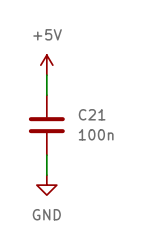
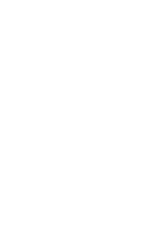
power symbol: +5V (46, 65) -> none
wire: (46, 75) (46, 95) -> none
C21: 100n (46, 125) -> none
wire: (46, 155) (46, 175) -> none
power symbol: GND (46, 185) -> none

